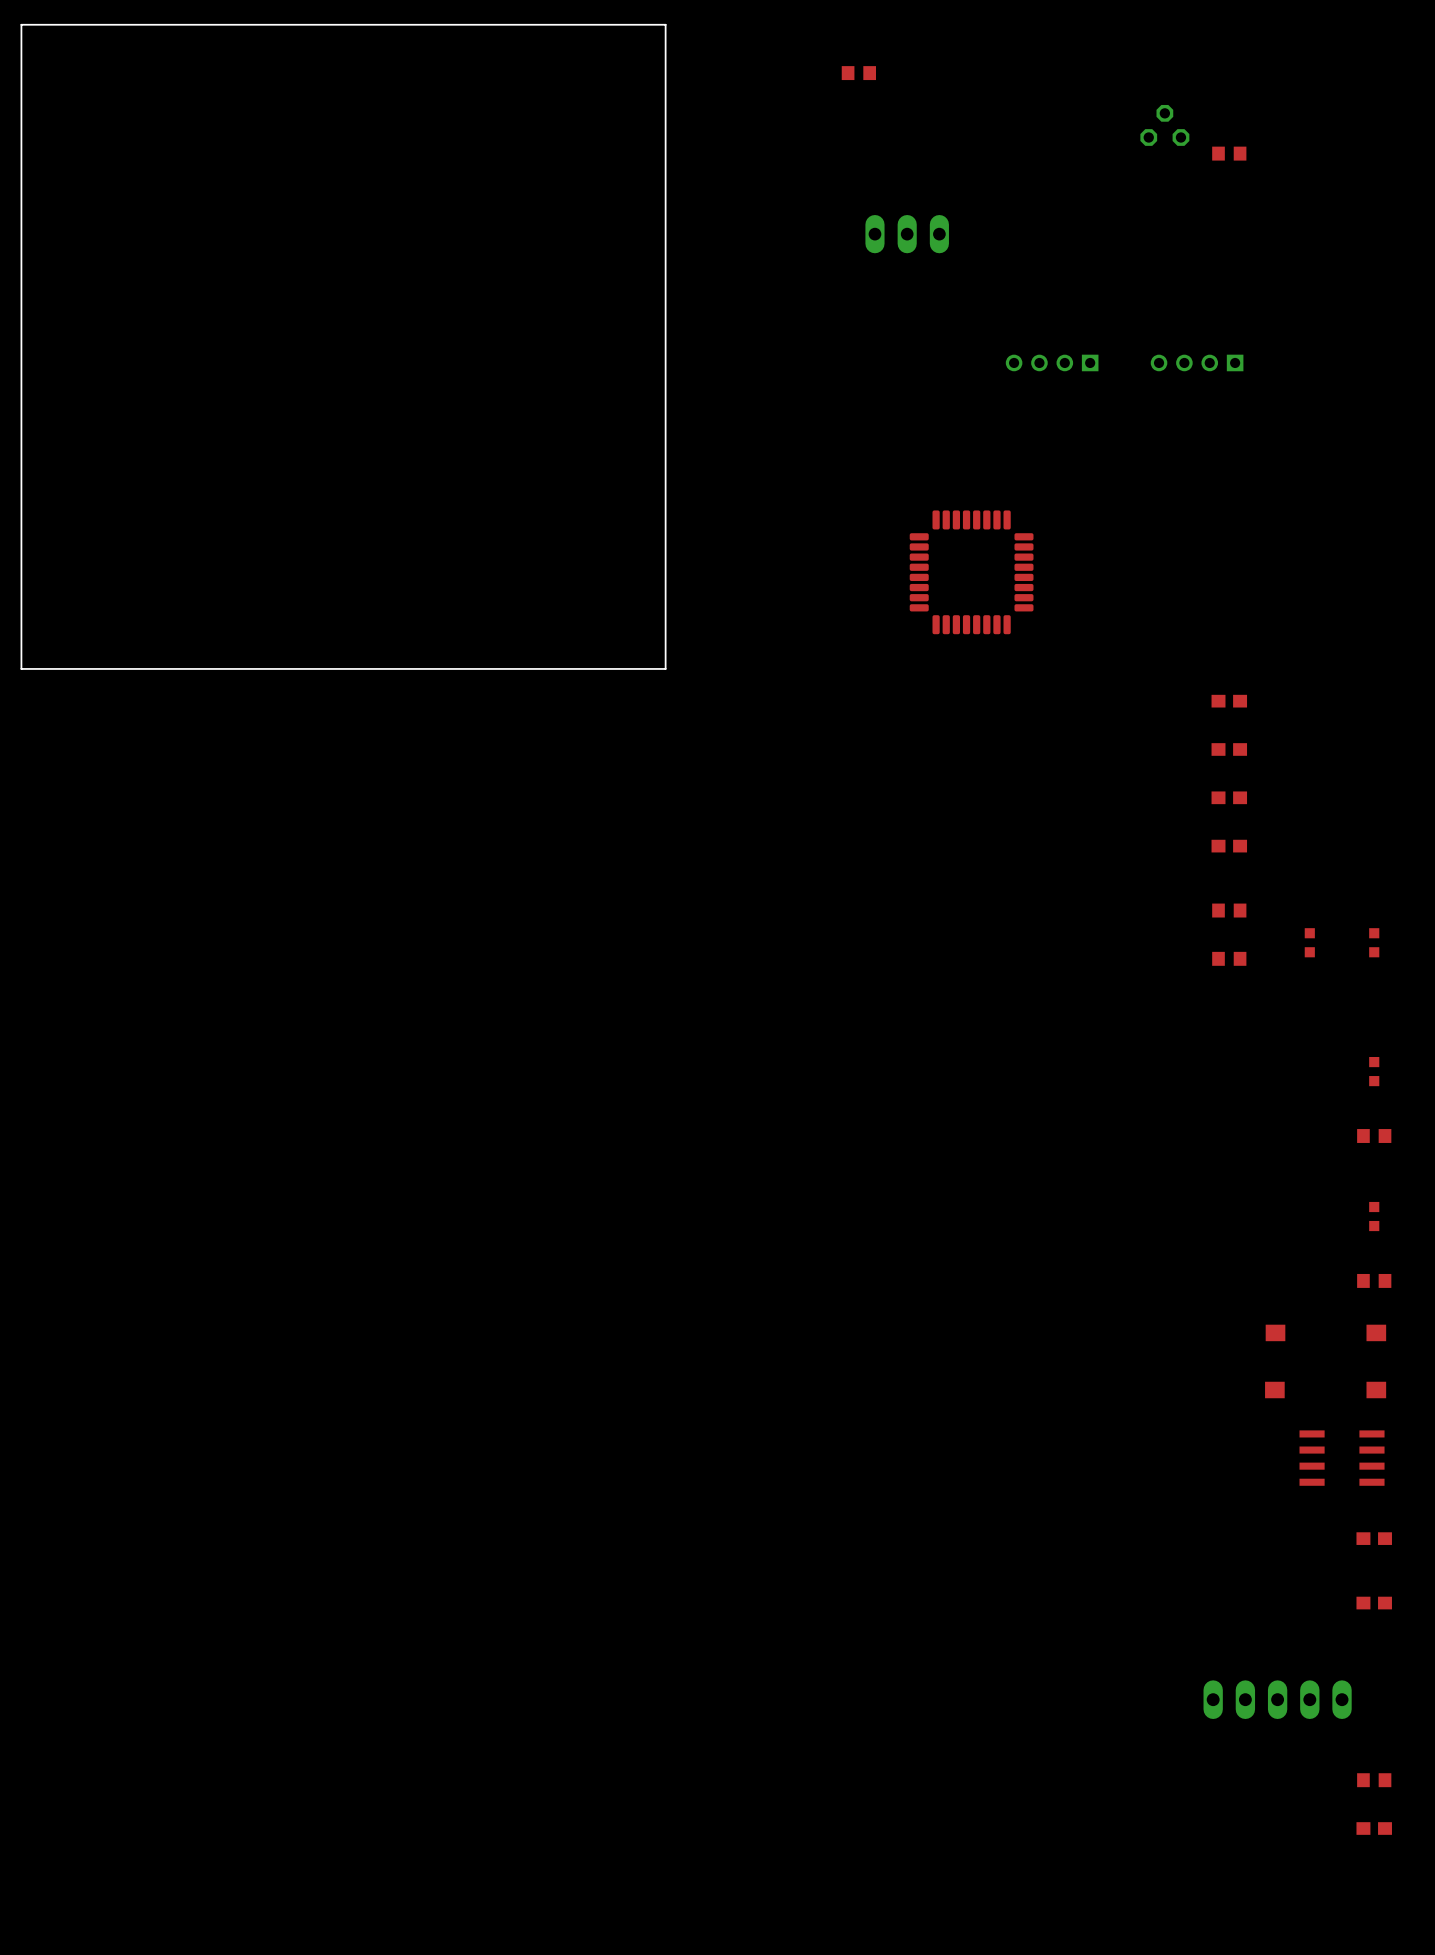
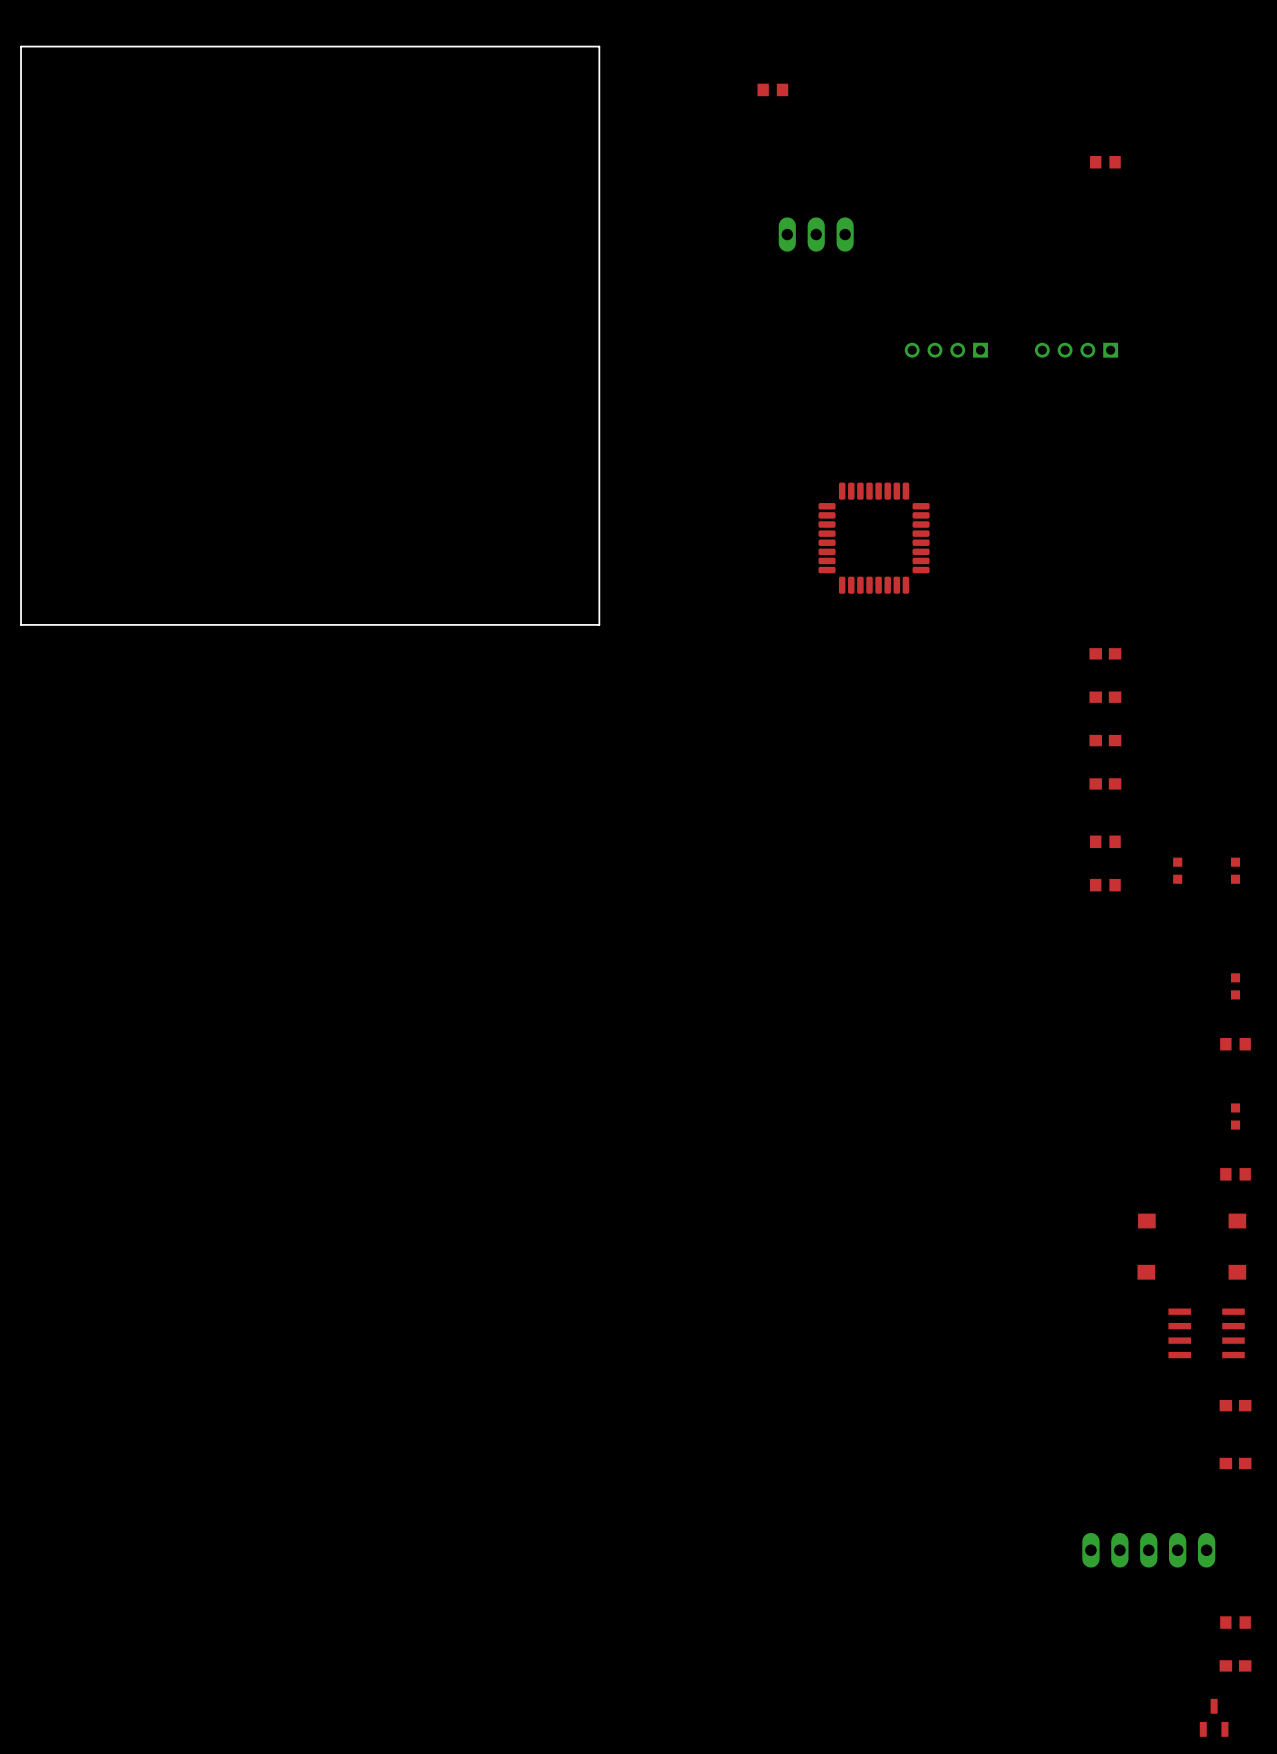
part: (1164, 125) -> none
part: none -> (1214, 1717)

